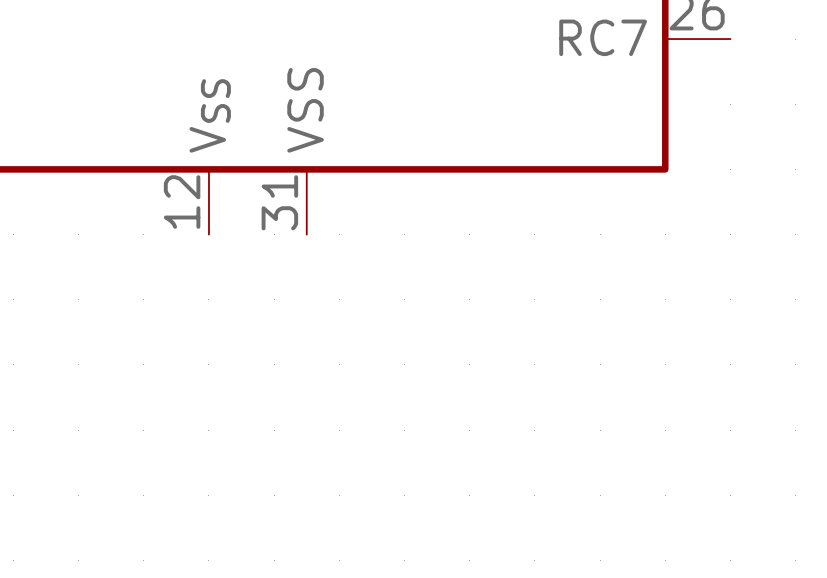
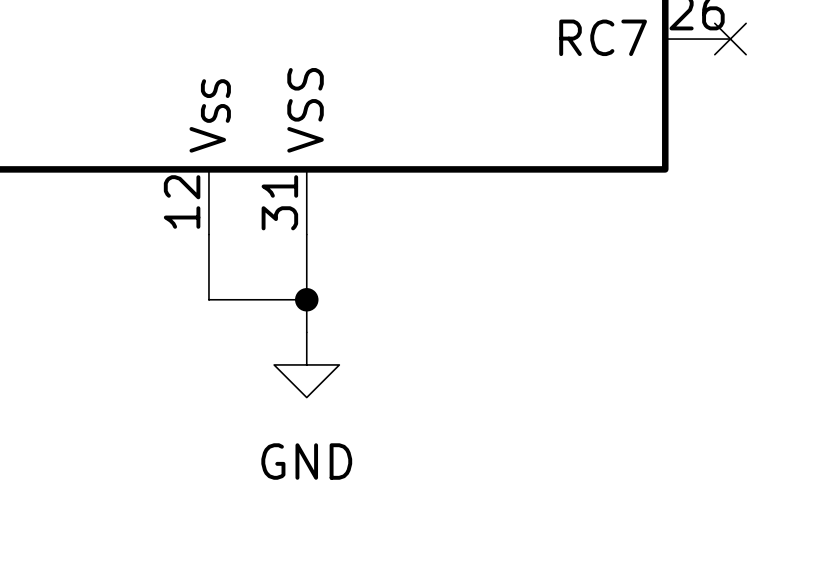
no-connect mark: none -> (730, 39)
wire: none -> (208, 234) (208, 299) (306, 299)
wire: none -> (306, 234) (306, 332)
junction: none -> (306, 299)
power symbol: none -> GND (306, 364)

